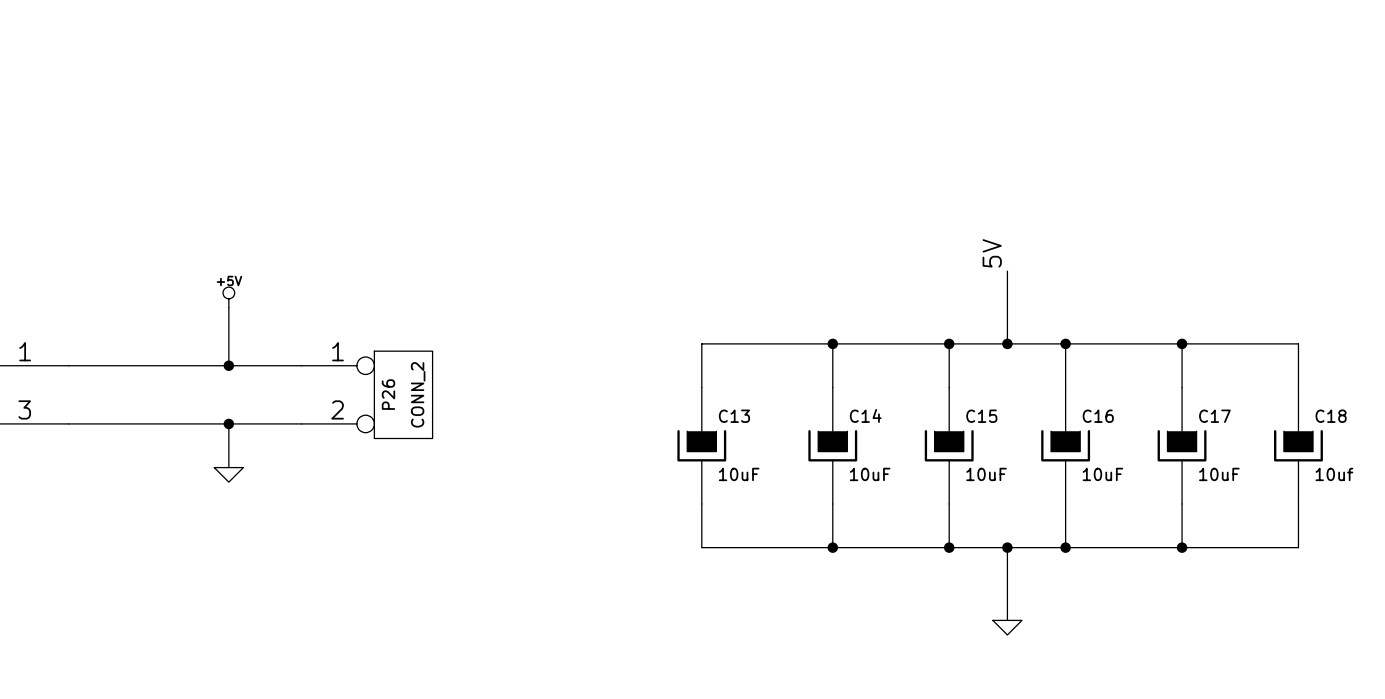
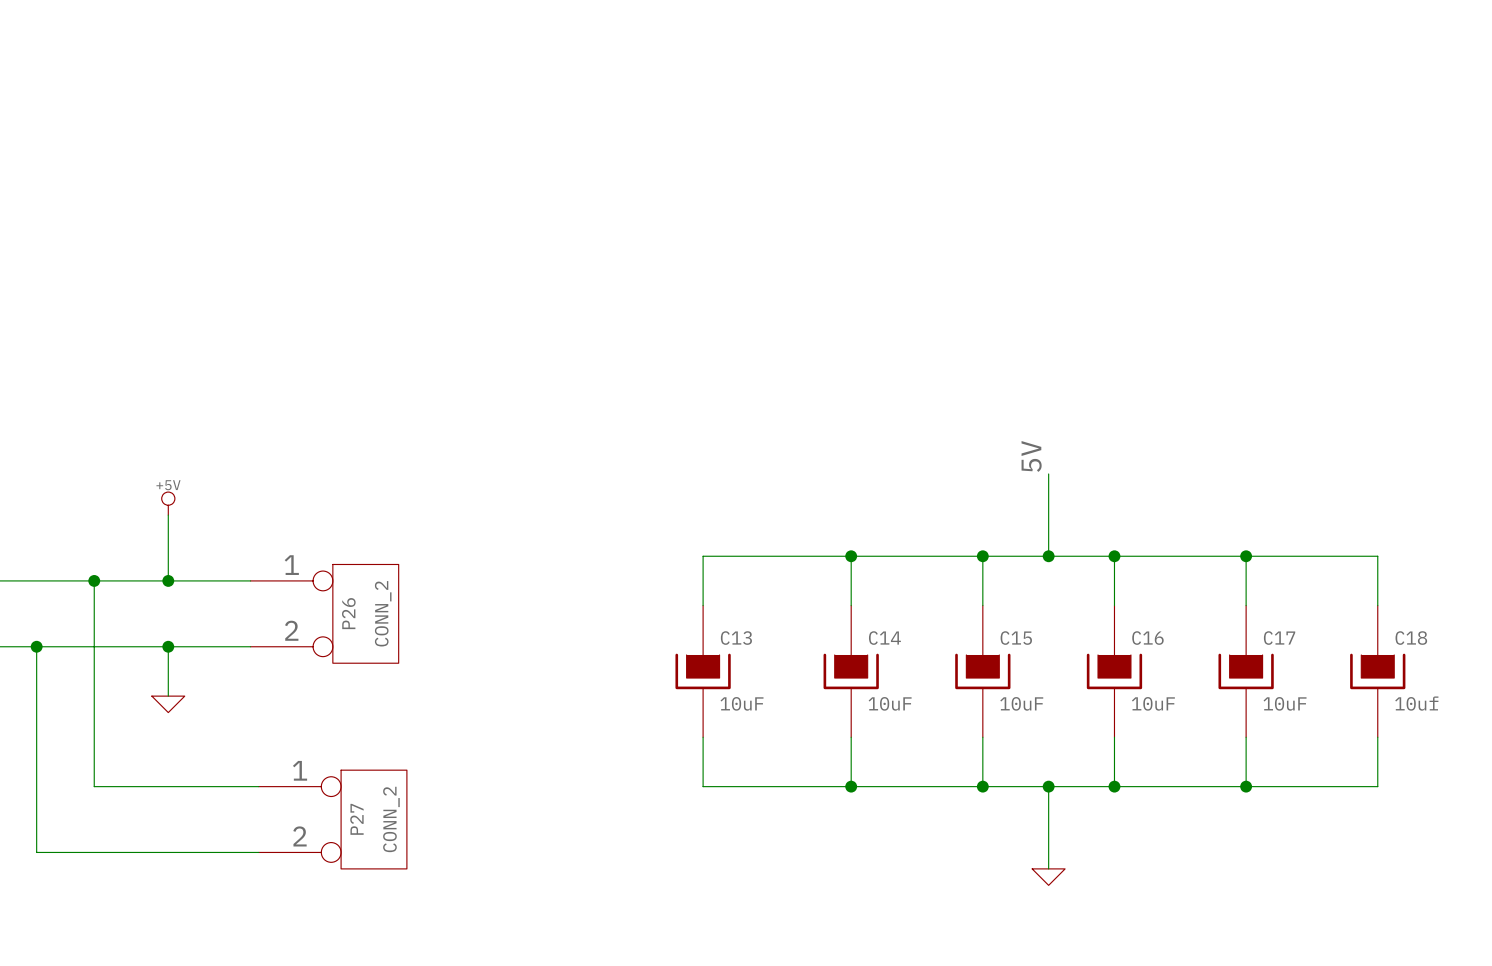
wire: none -> (94, 580) (94, 786) (258, 786)
junction: none -> (94, 580)
wire: none -> (36, 646) (36, 852) (258, 852)
junction: none -> (36, 646)
P27: none -> CONN_2 (332, 819)

